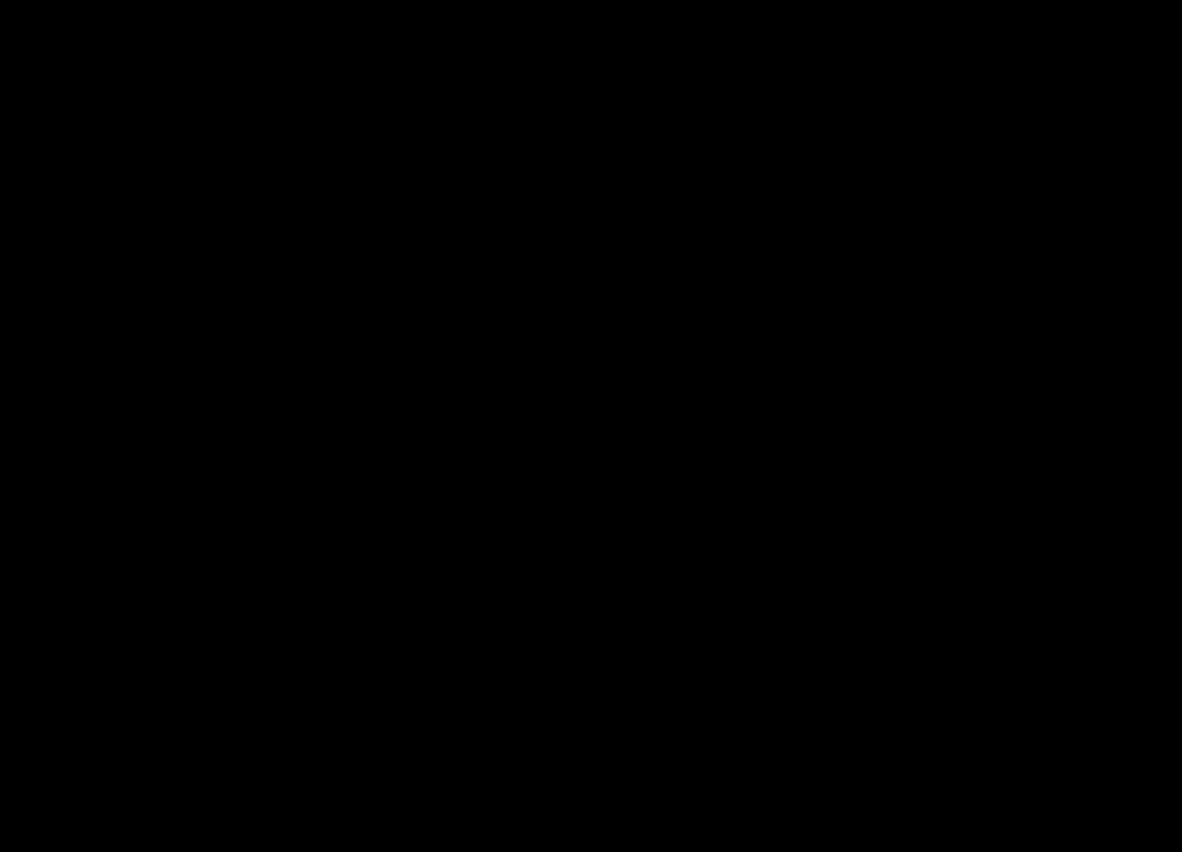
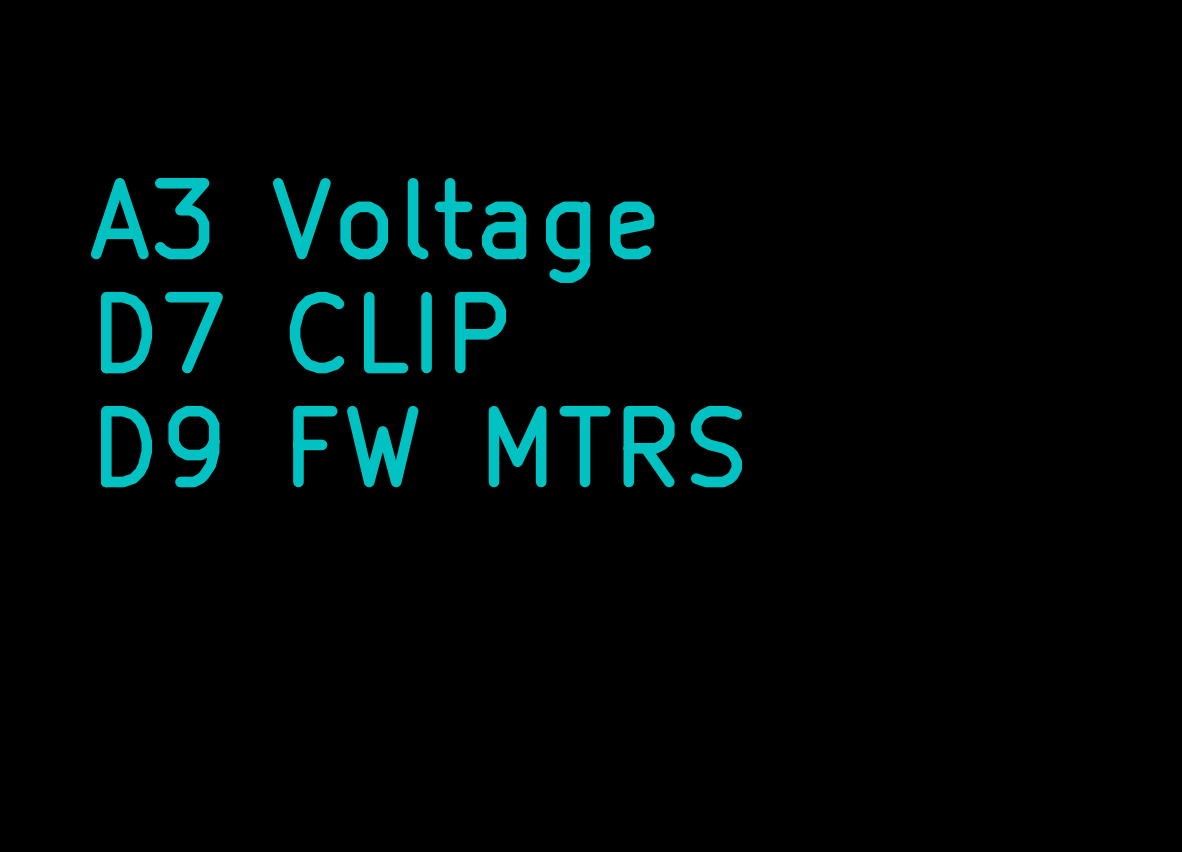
text: none -> A3 Voltage (372, 230)
text: none -> D7 CLIP (303, 332)
text: none -> D9 FW MTRS (421, 446)

